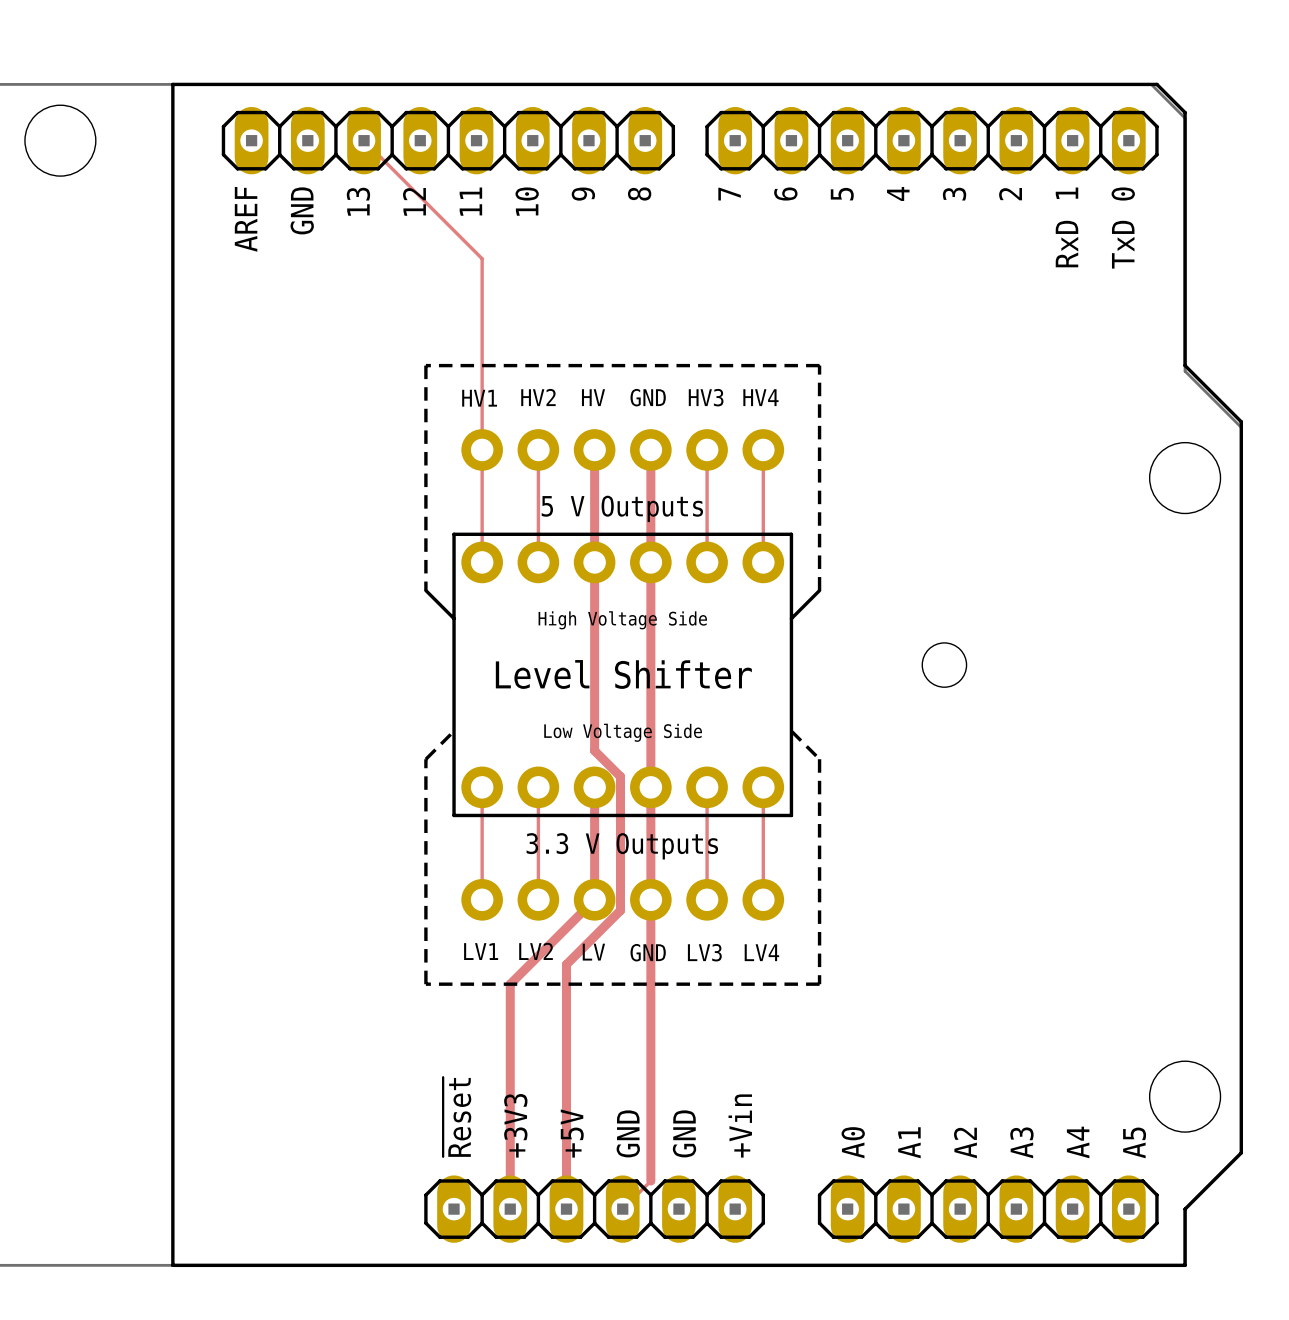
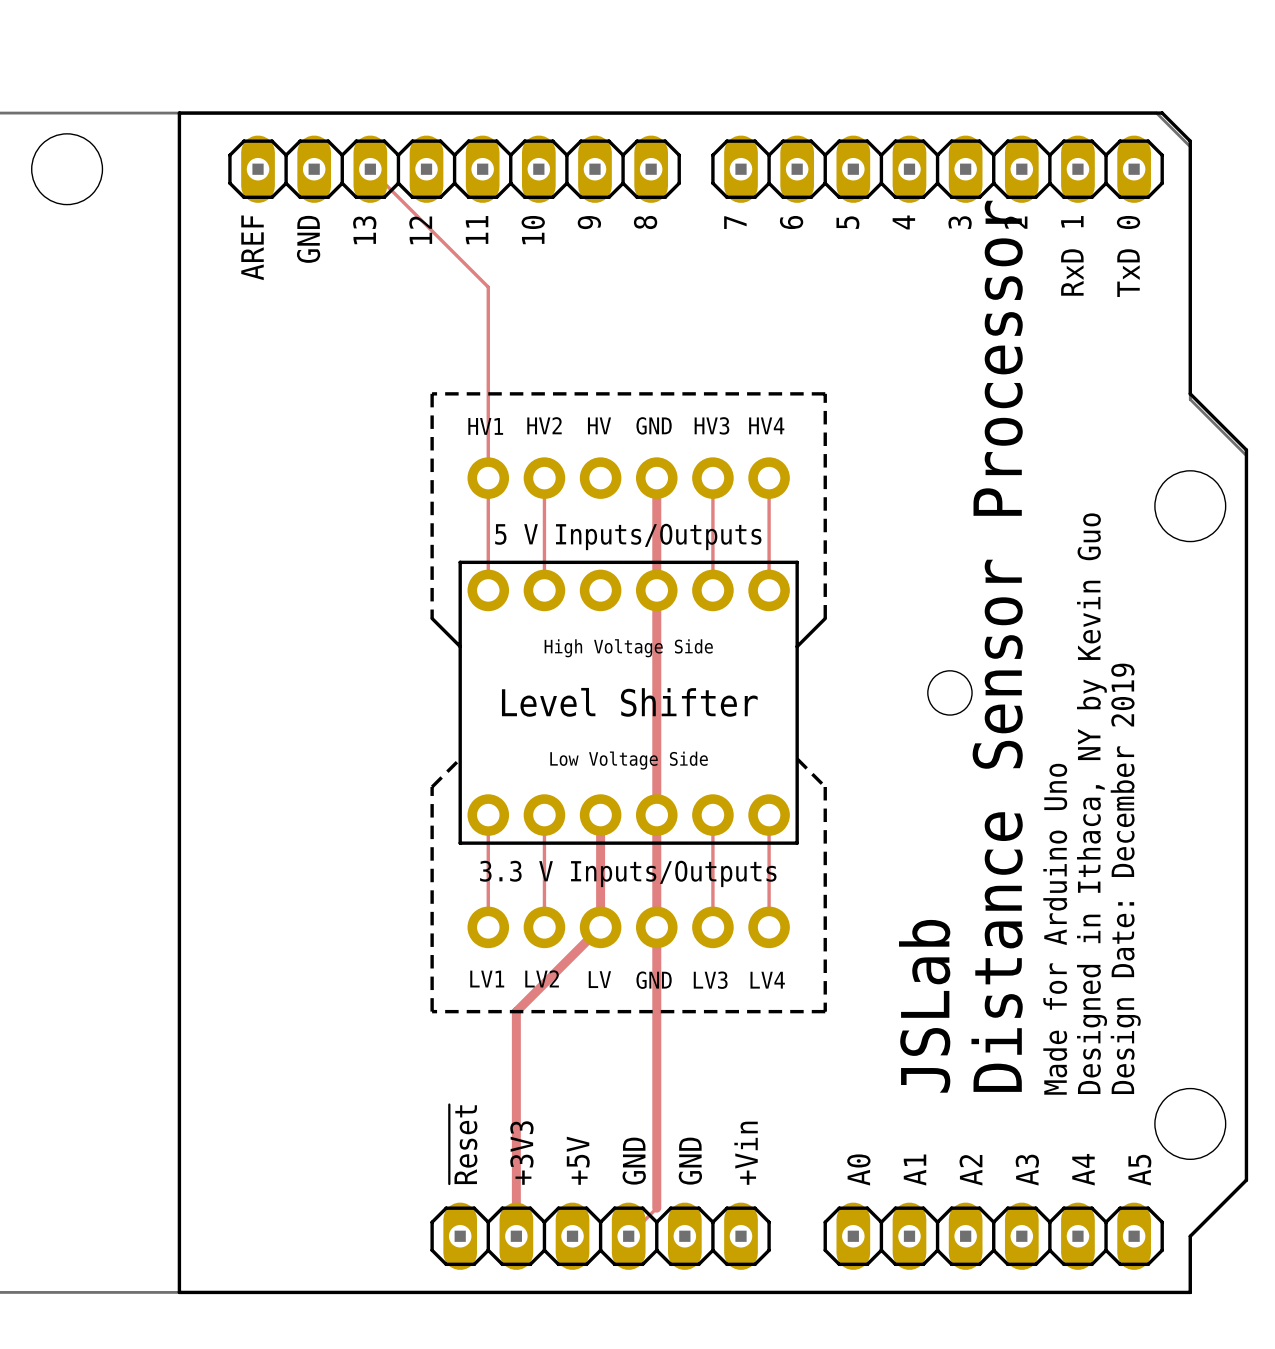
track: (594, 449) (594, 750) (620, 776) (620, 910) (566, 964) (566, 1209) -> none
text: 5 V Outputs (622, 508) -> 5 V Inputs/Outputs (628, 536)
text: none -> Distance Sensor Processor (997, 646)
text: none -> Designed in Ithaca, NY by Kevin Guo (1092, 803)
text: 3.3 V Outputs (622, 846) -> 3.3 V Inputs/Outputs (628, 873)
text: none -> Design Date: December 2019 (1125, 878)
text: none -> Made for Arduino Uno (1055, 929)
text: none -> JSLab (924, 1006)

